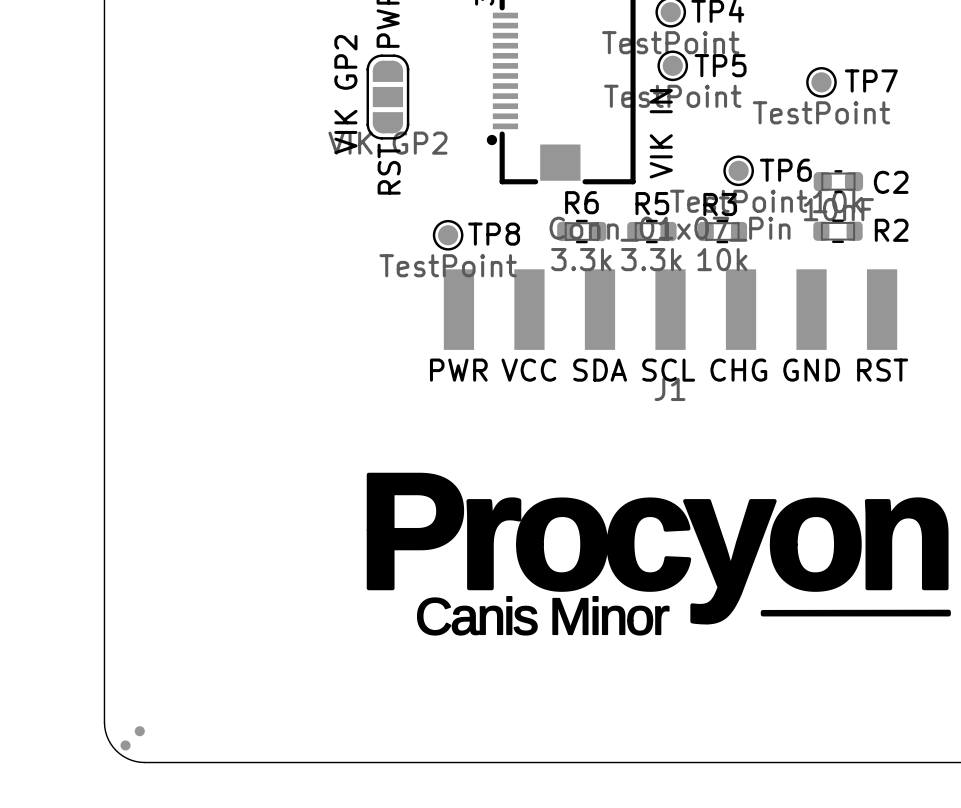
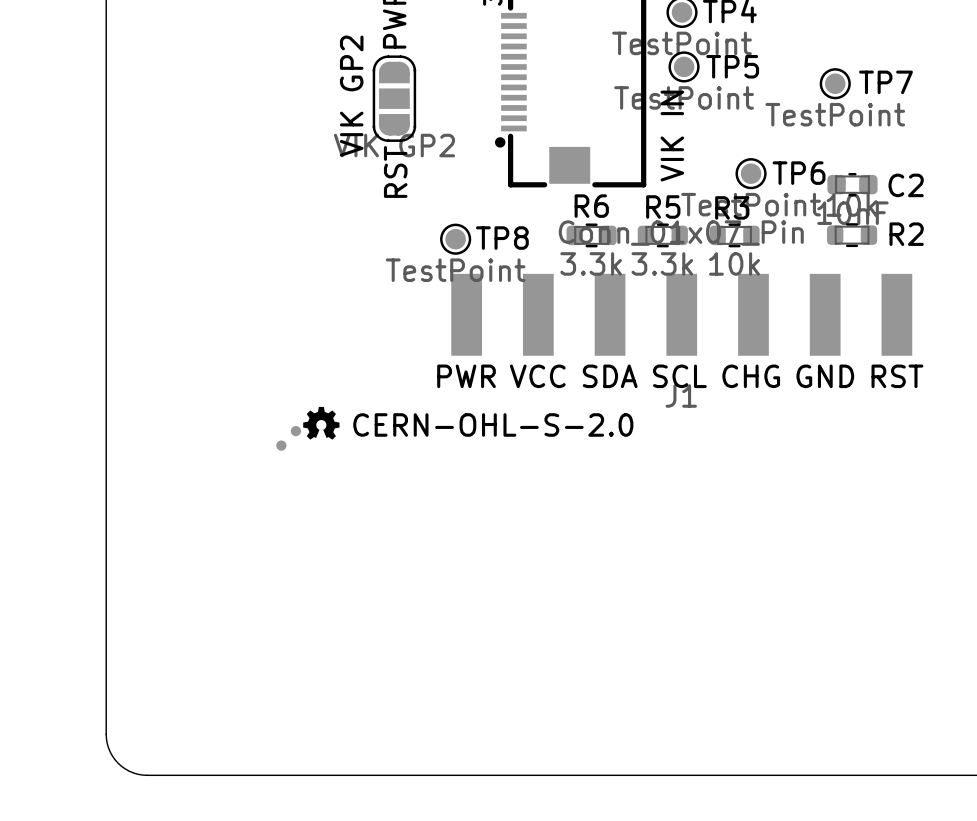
drawing: none -> [303, 406, 340, 440]
text: none -> CERN-OHL-S-2.0 (493, 424)
drawing: [366, 472, 951, 636] -> none
part position: (132, 738) -> (288, 438)

